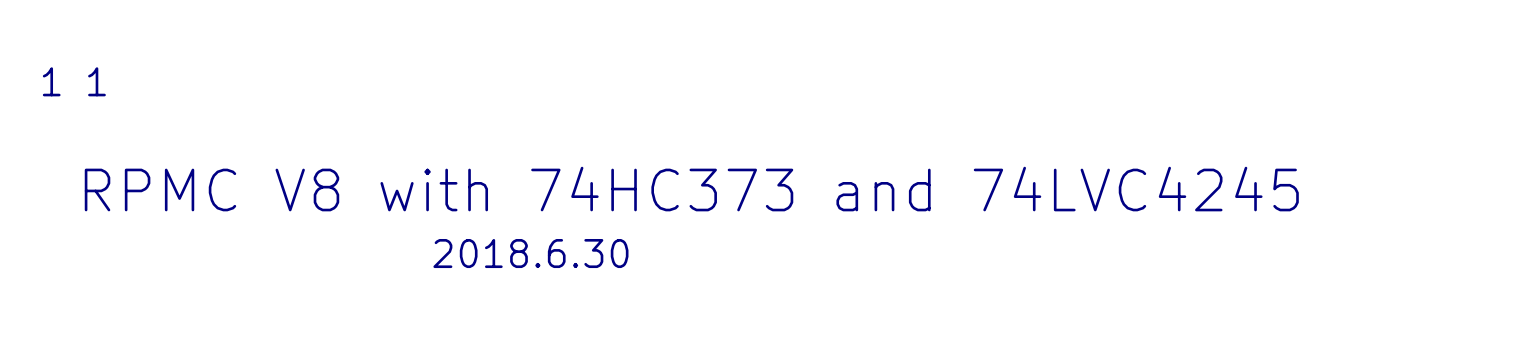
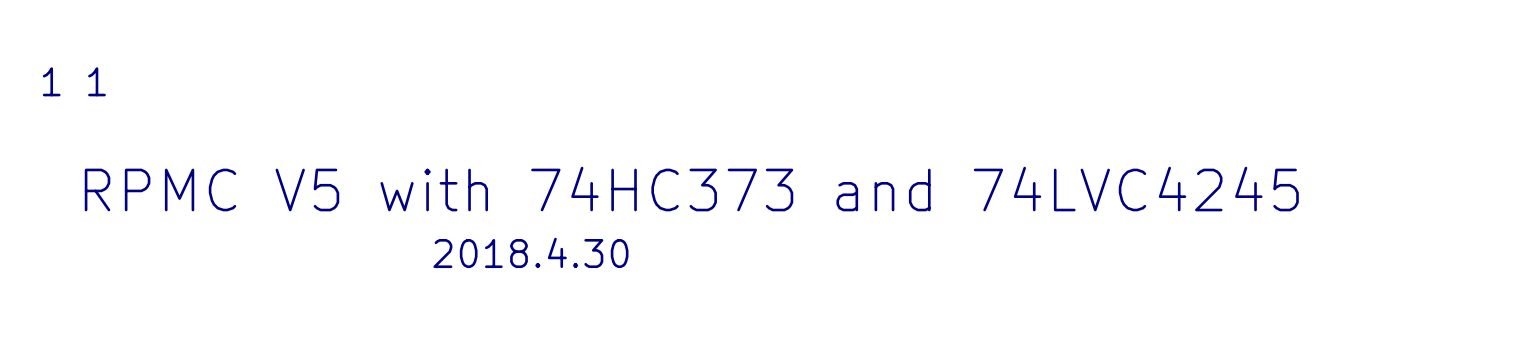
text: RPMC V8 with 74HC373 and 74LVC4245 (691, 189) -> RPMC V5 with 74HC373 and 74LVC4245 (691, 189)
text: 2018.6.30 (530, 253) -> 2018.4.30 (530, 252)

